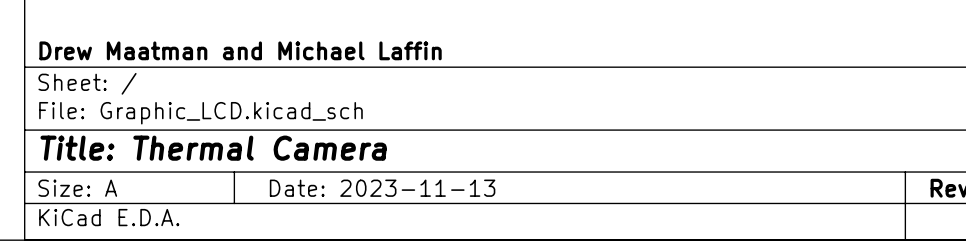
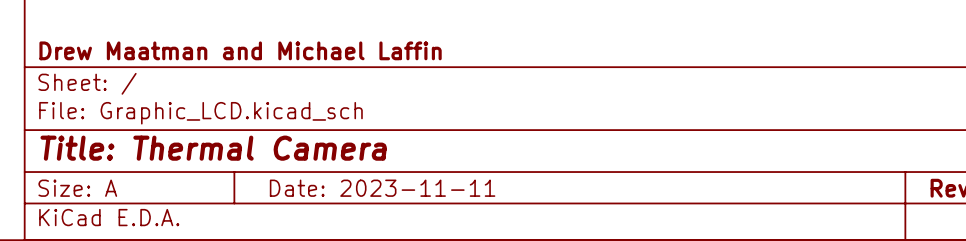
title block: Date: 2023-11-13 (382, 188) -> Date: 2023-11-11 (382, 188)

